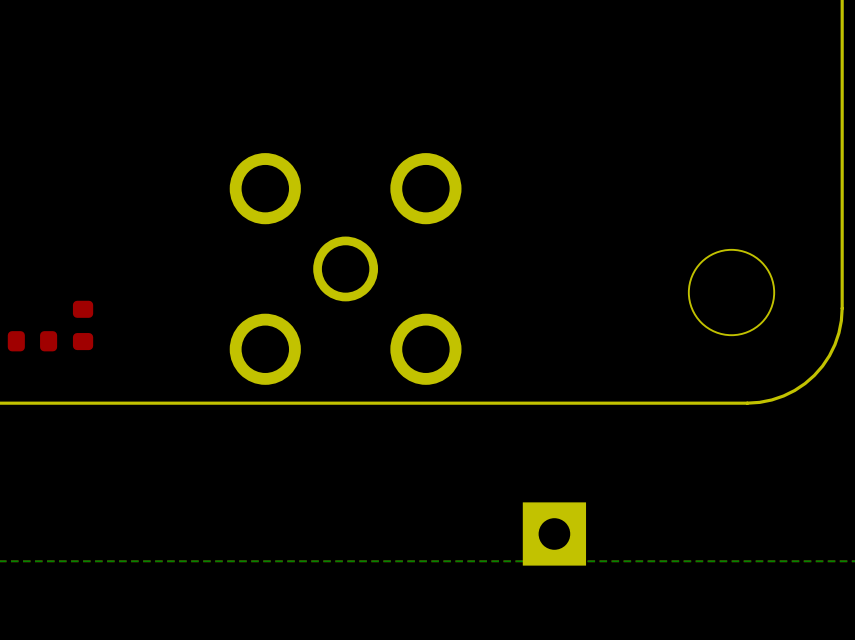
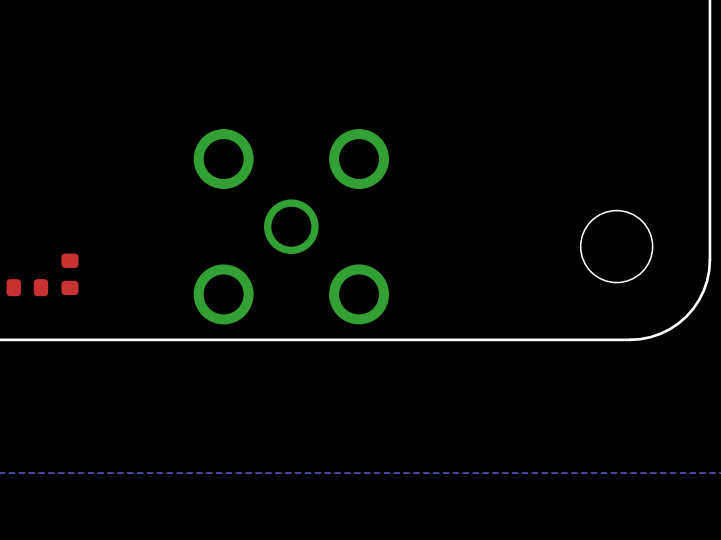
part: (554, 533) -> none

